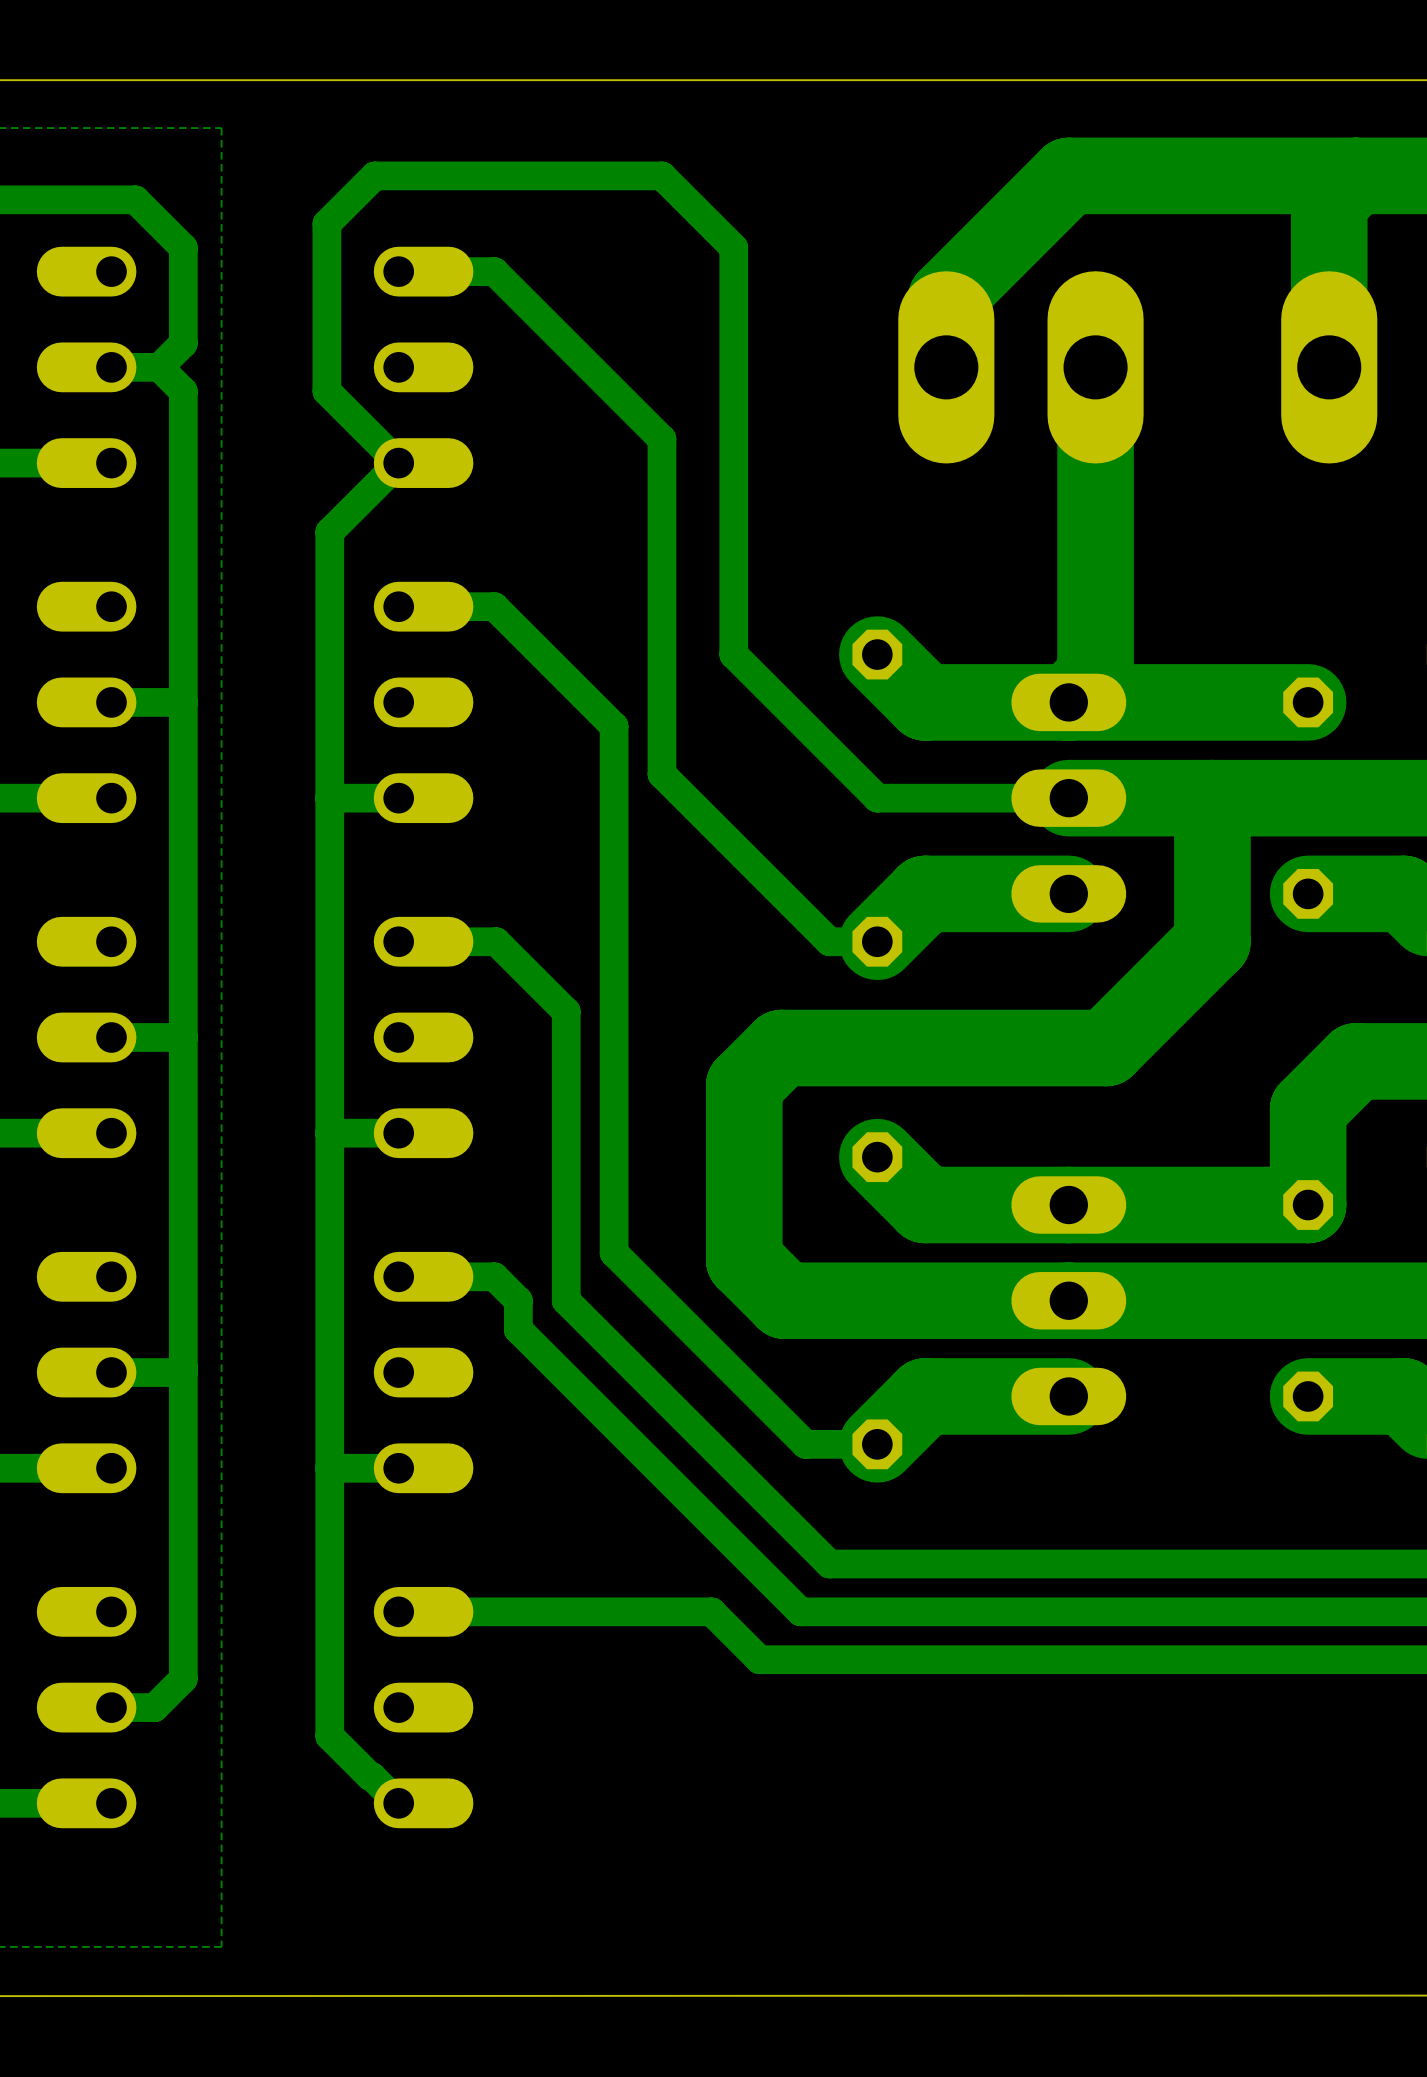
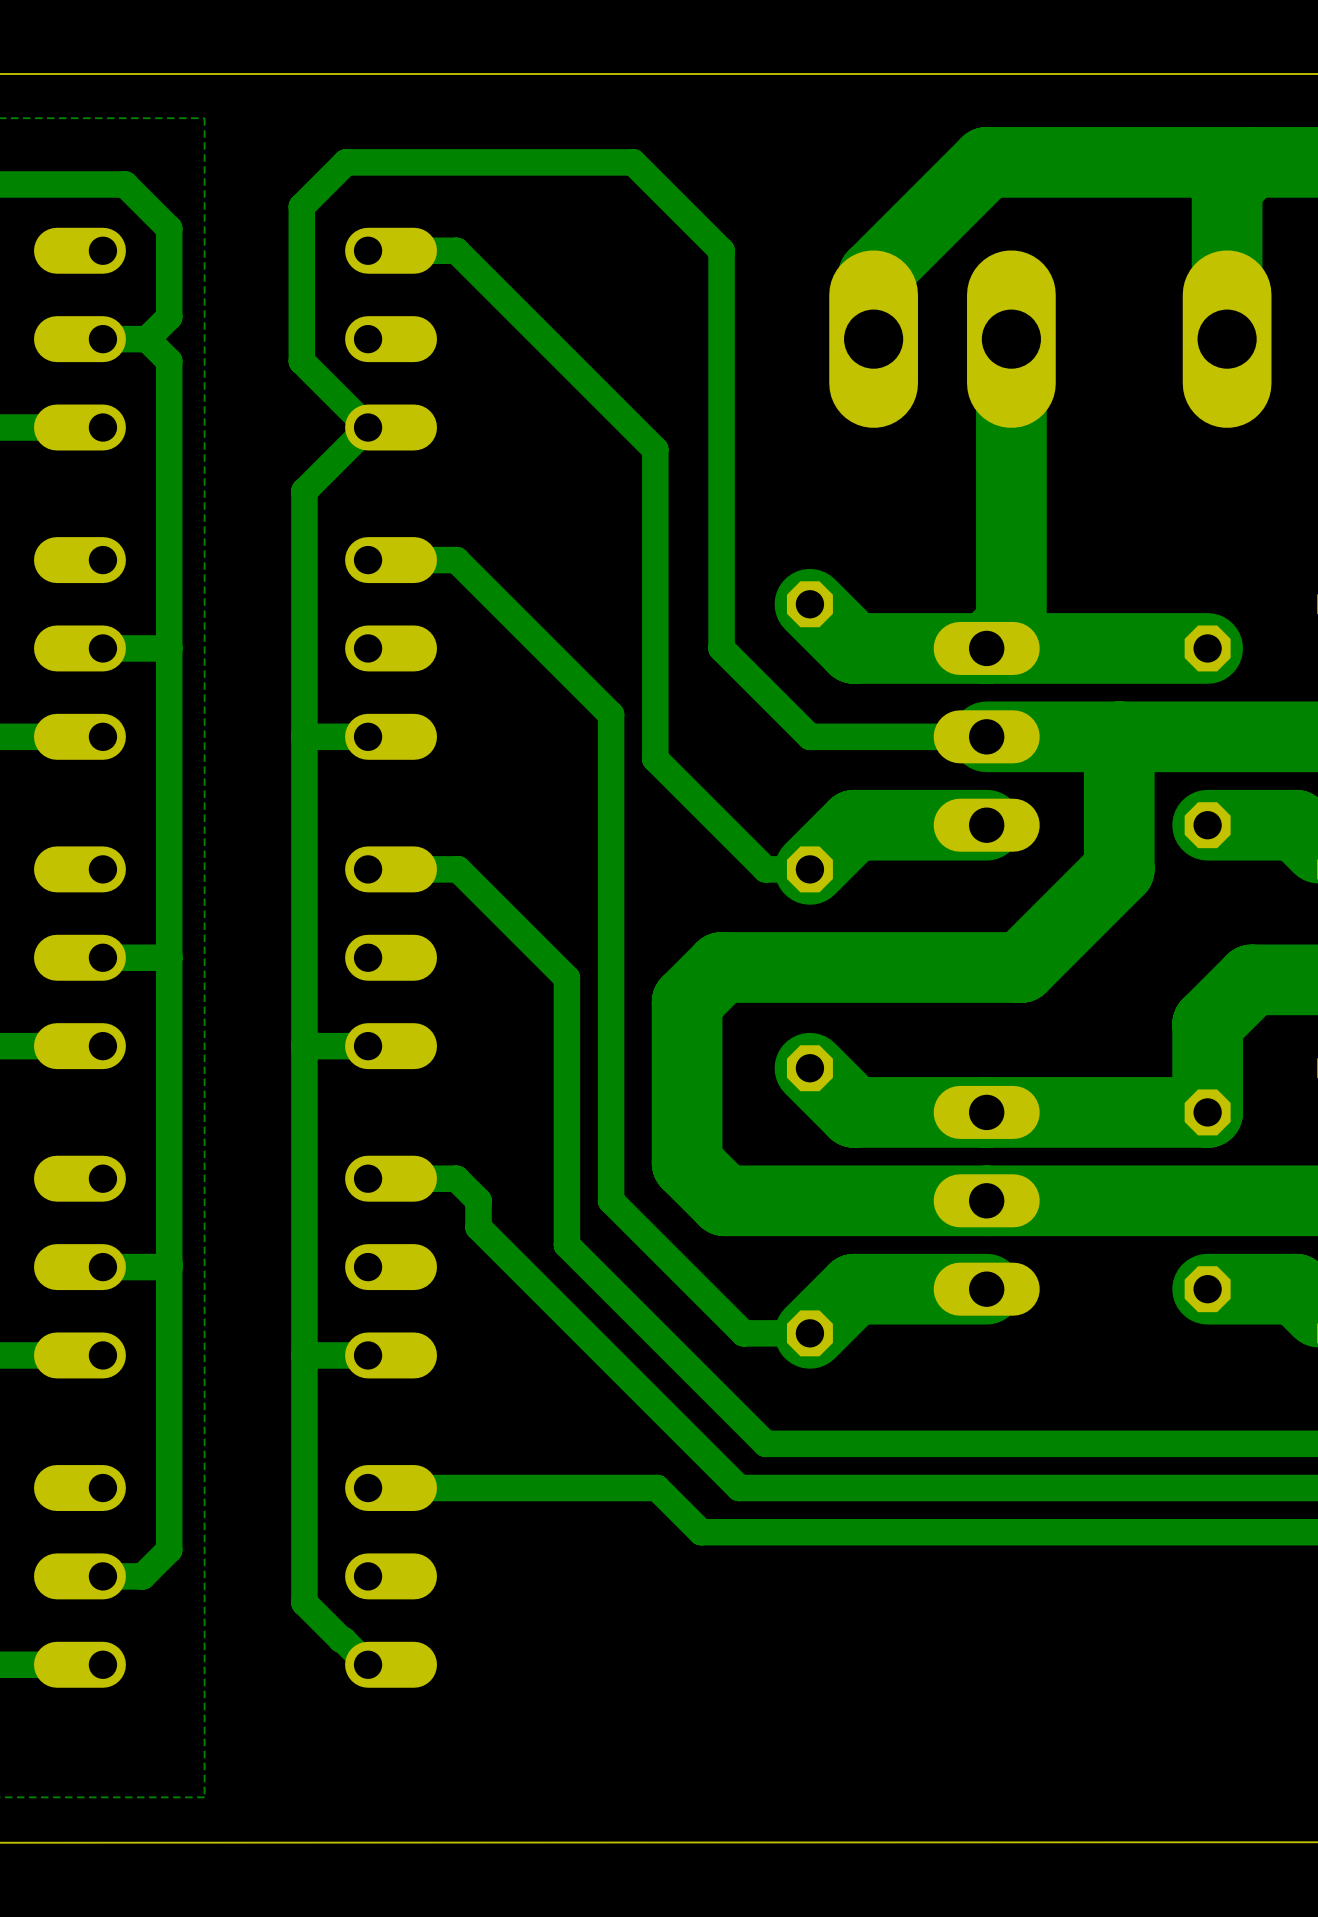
bottom track: (661, 175) (733, 247) (733, 654) (781, 702) -> (611, 162) (633, 162) (721, 250) (721, 648)
bottom track: (661, 439) (661, 774) (709, 822) -> (611, 405) (655, 449) (655, 758)
bottom track: (614, 726) (614, 1059) -> (566, 670) (611, 714) (611, 1200)
bottom track: (566, 1011) (566, 1300) (614, 1348) -> (522, 933) (566, 978)
bottom track: (614, 1252) (661, 1300) -> (566, 1156) (566, 1244)

